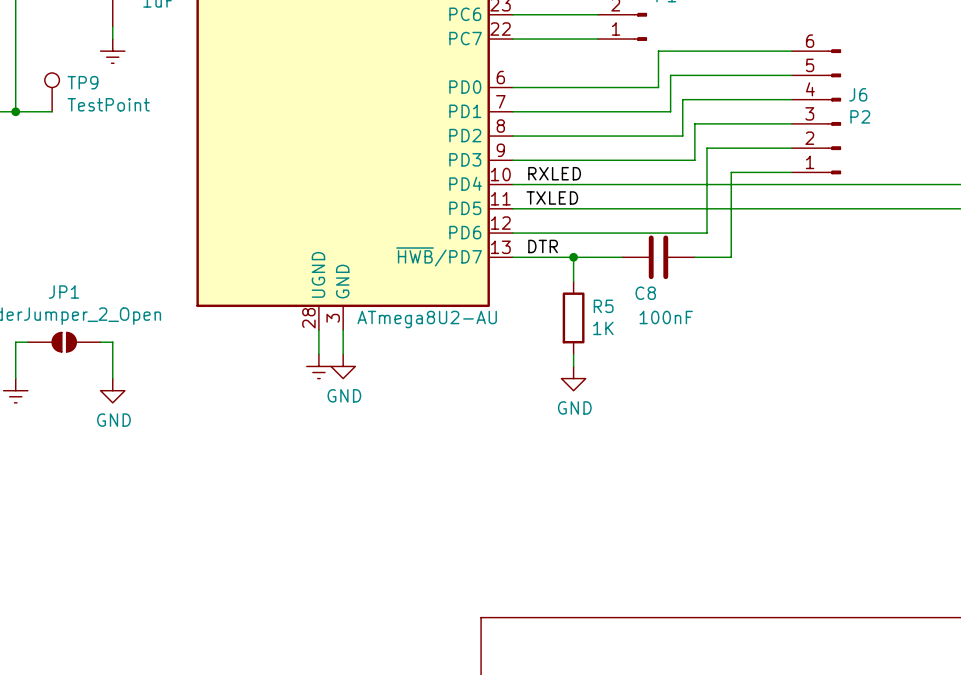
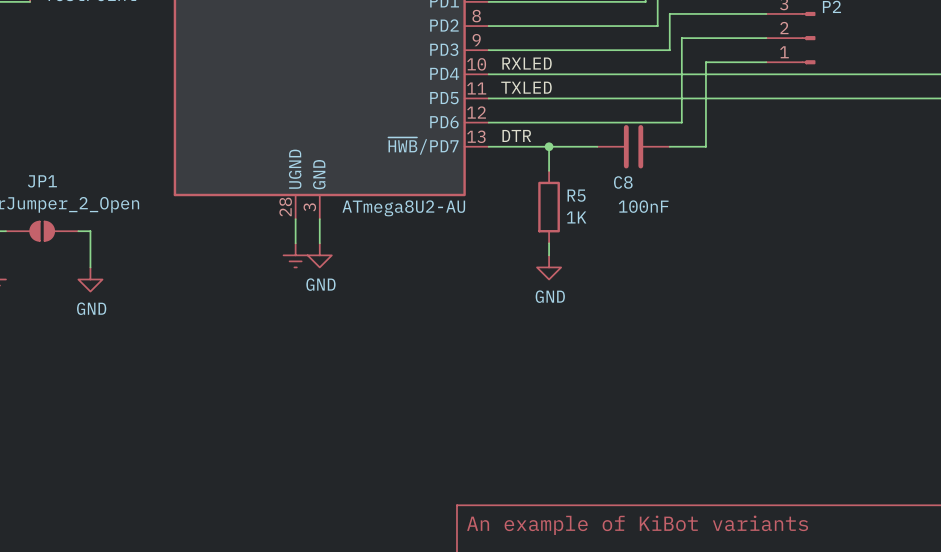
title block: none -> An example of KiBot variants (637, 525)

